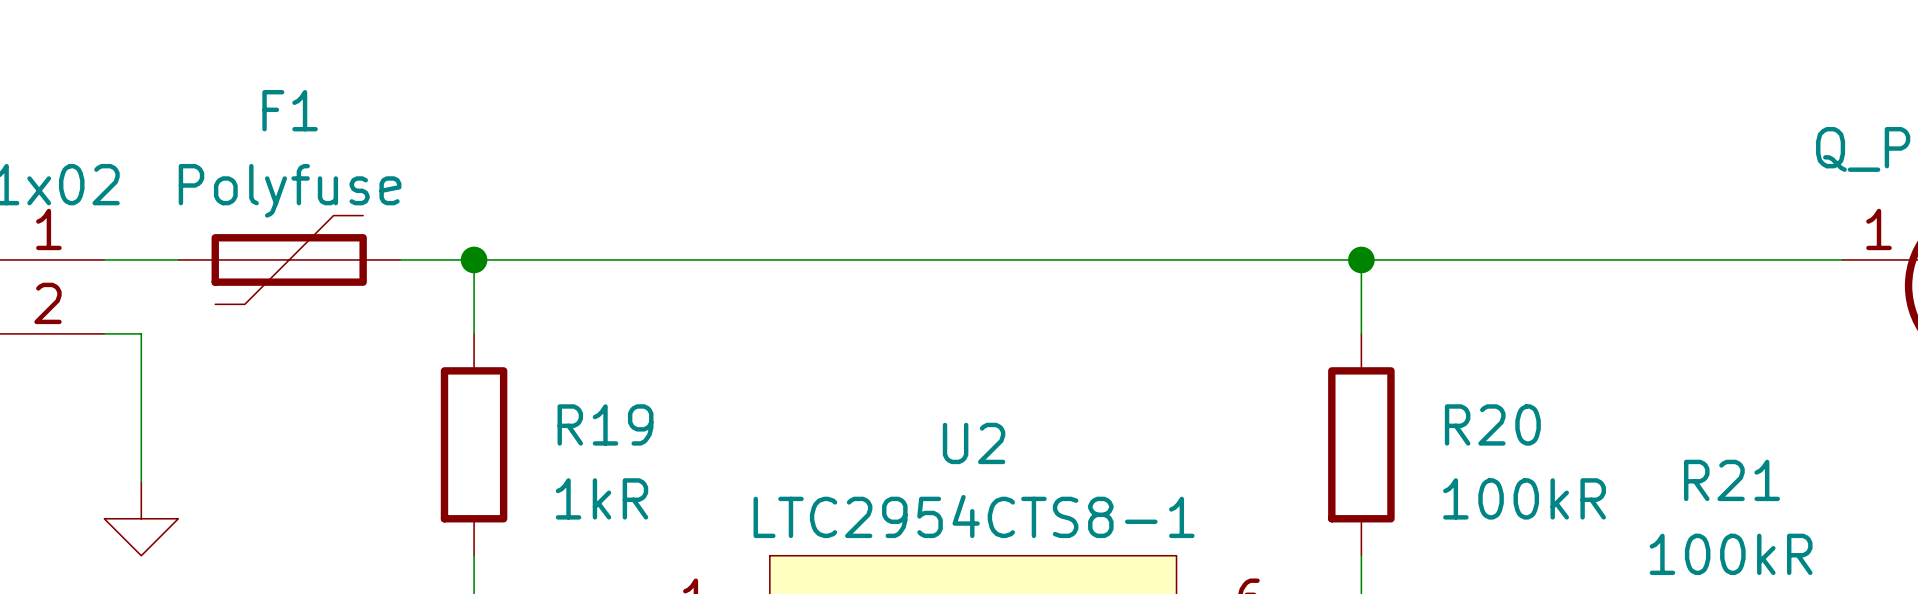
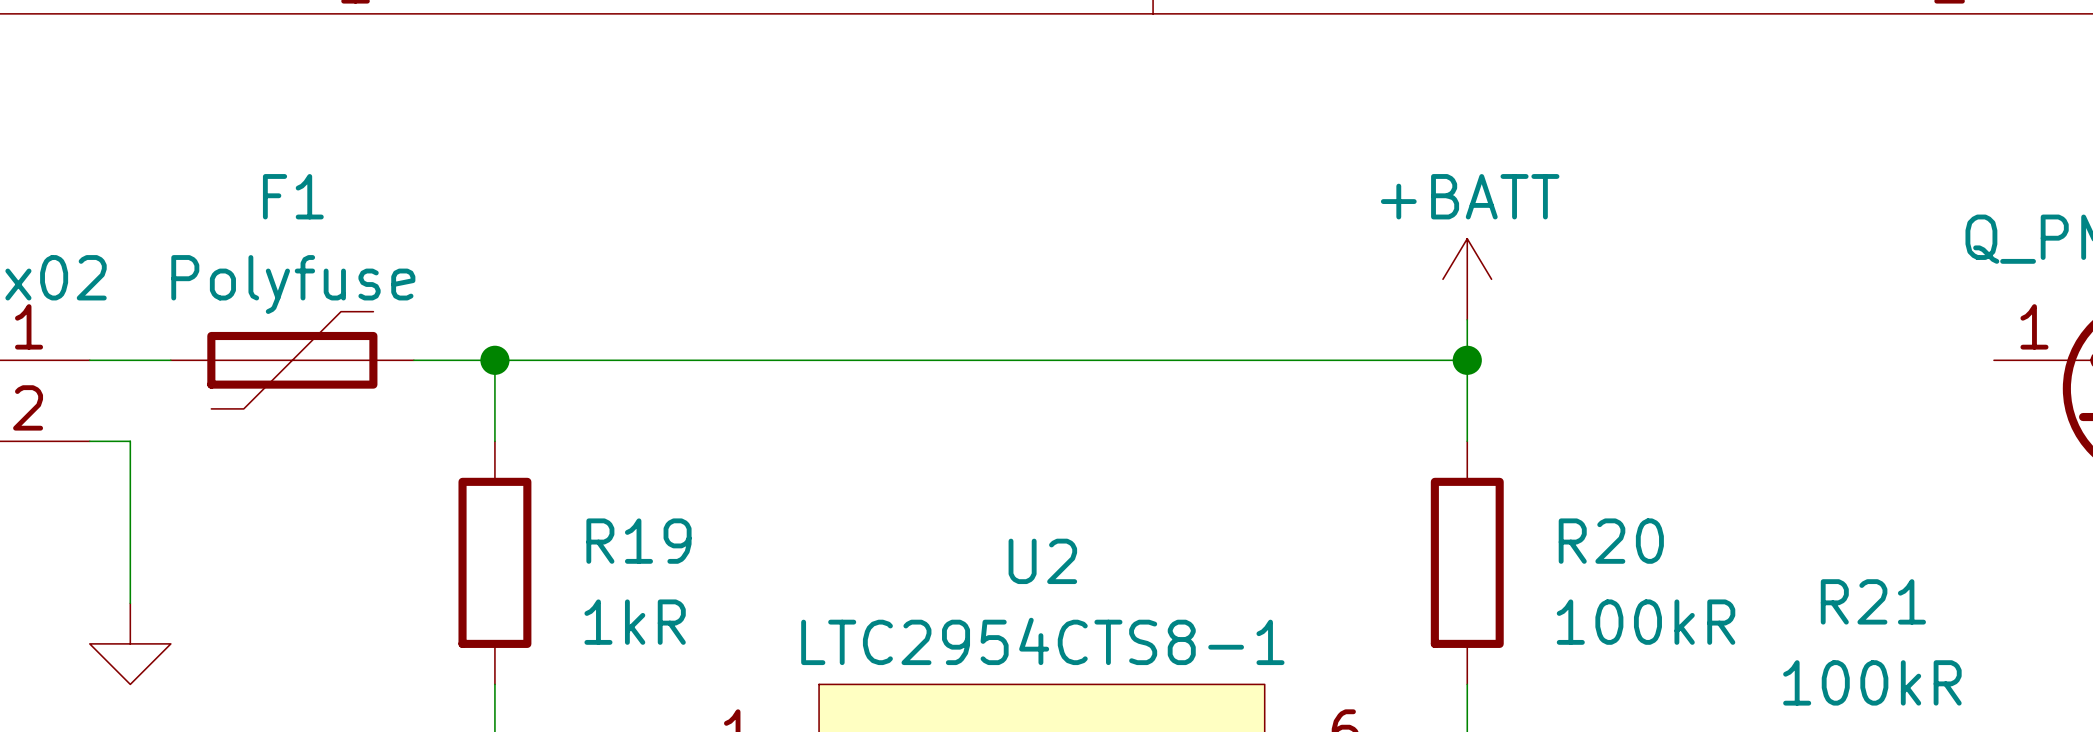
power symbol: none -> +BATT (1467, 279)
wire: (1361, 259) (1842, 259) -> (1467, 360) (1467, 319)

